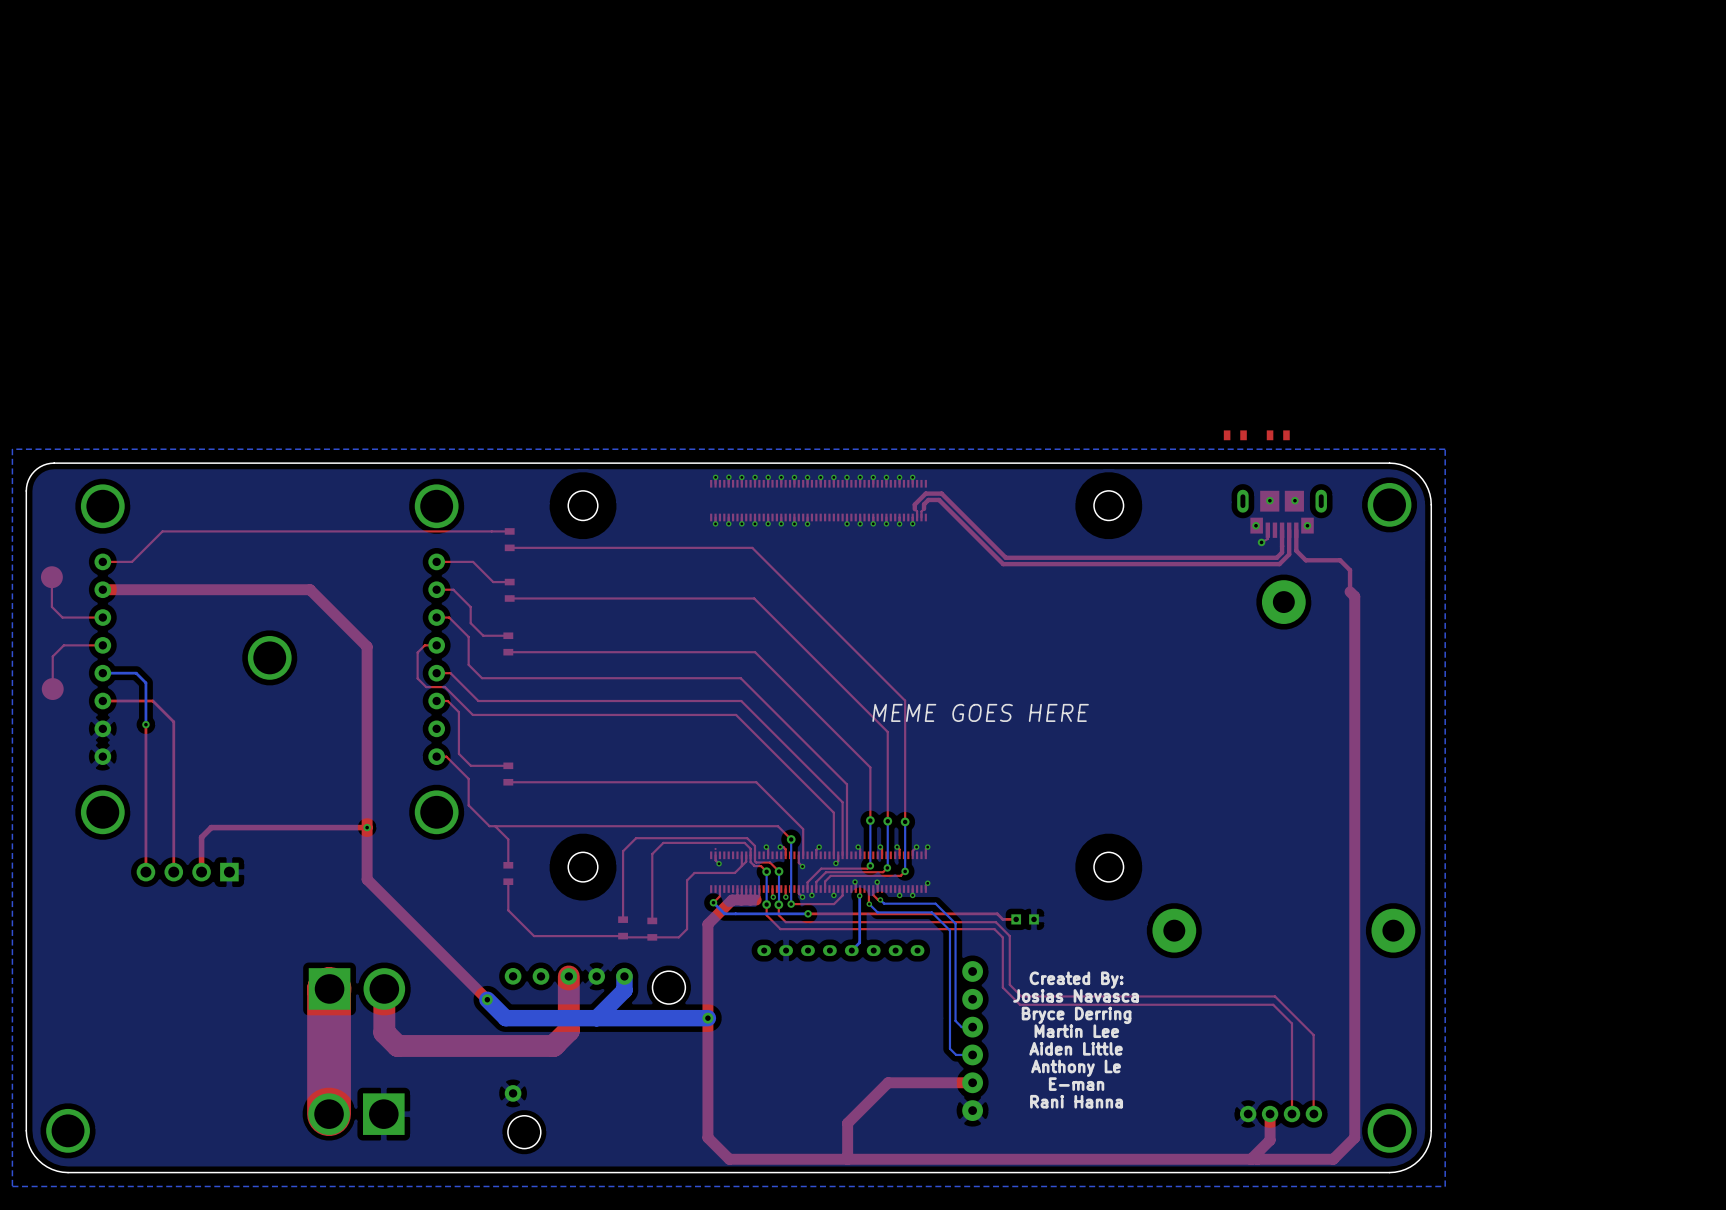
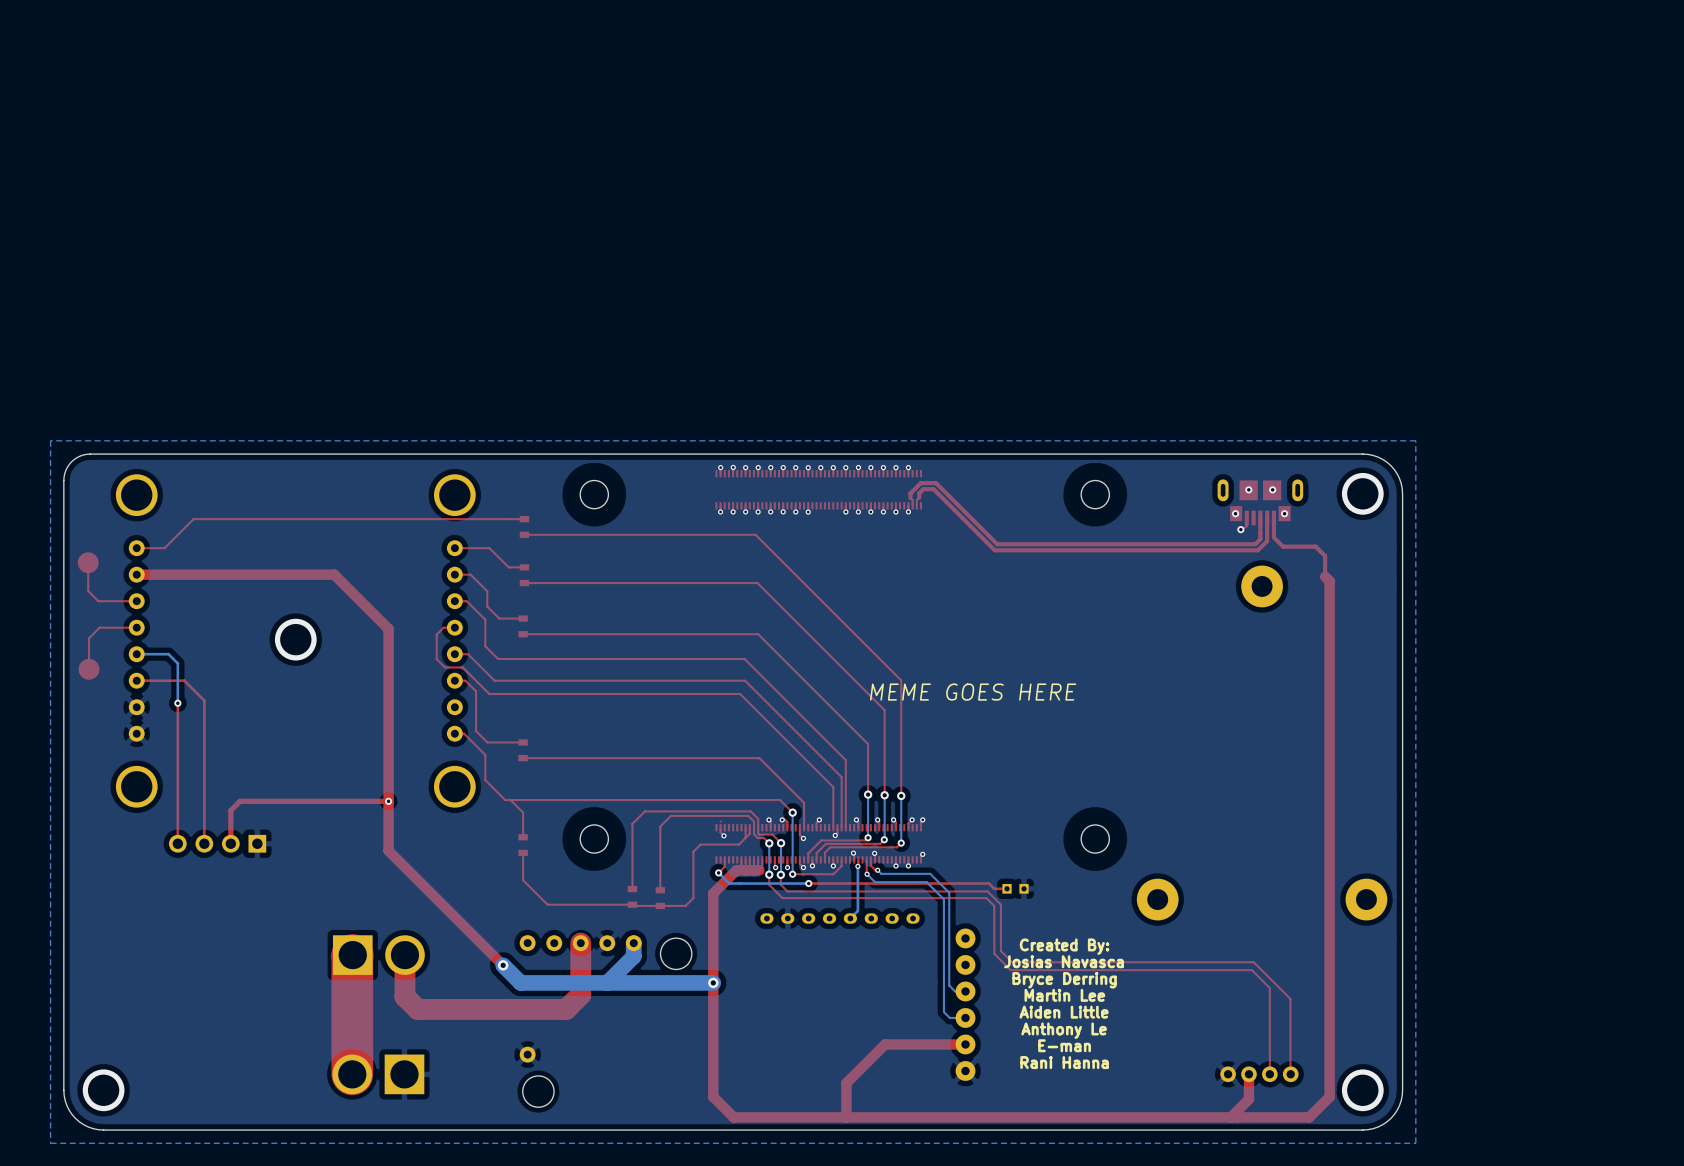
part: (1235, 435) -> none
part: (1278, 435) -> none

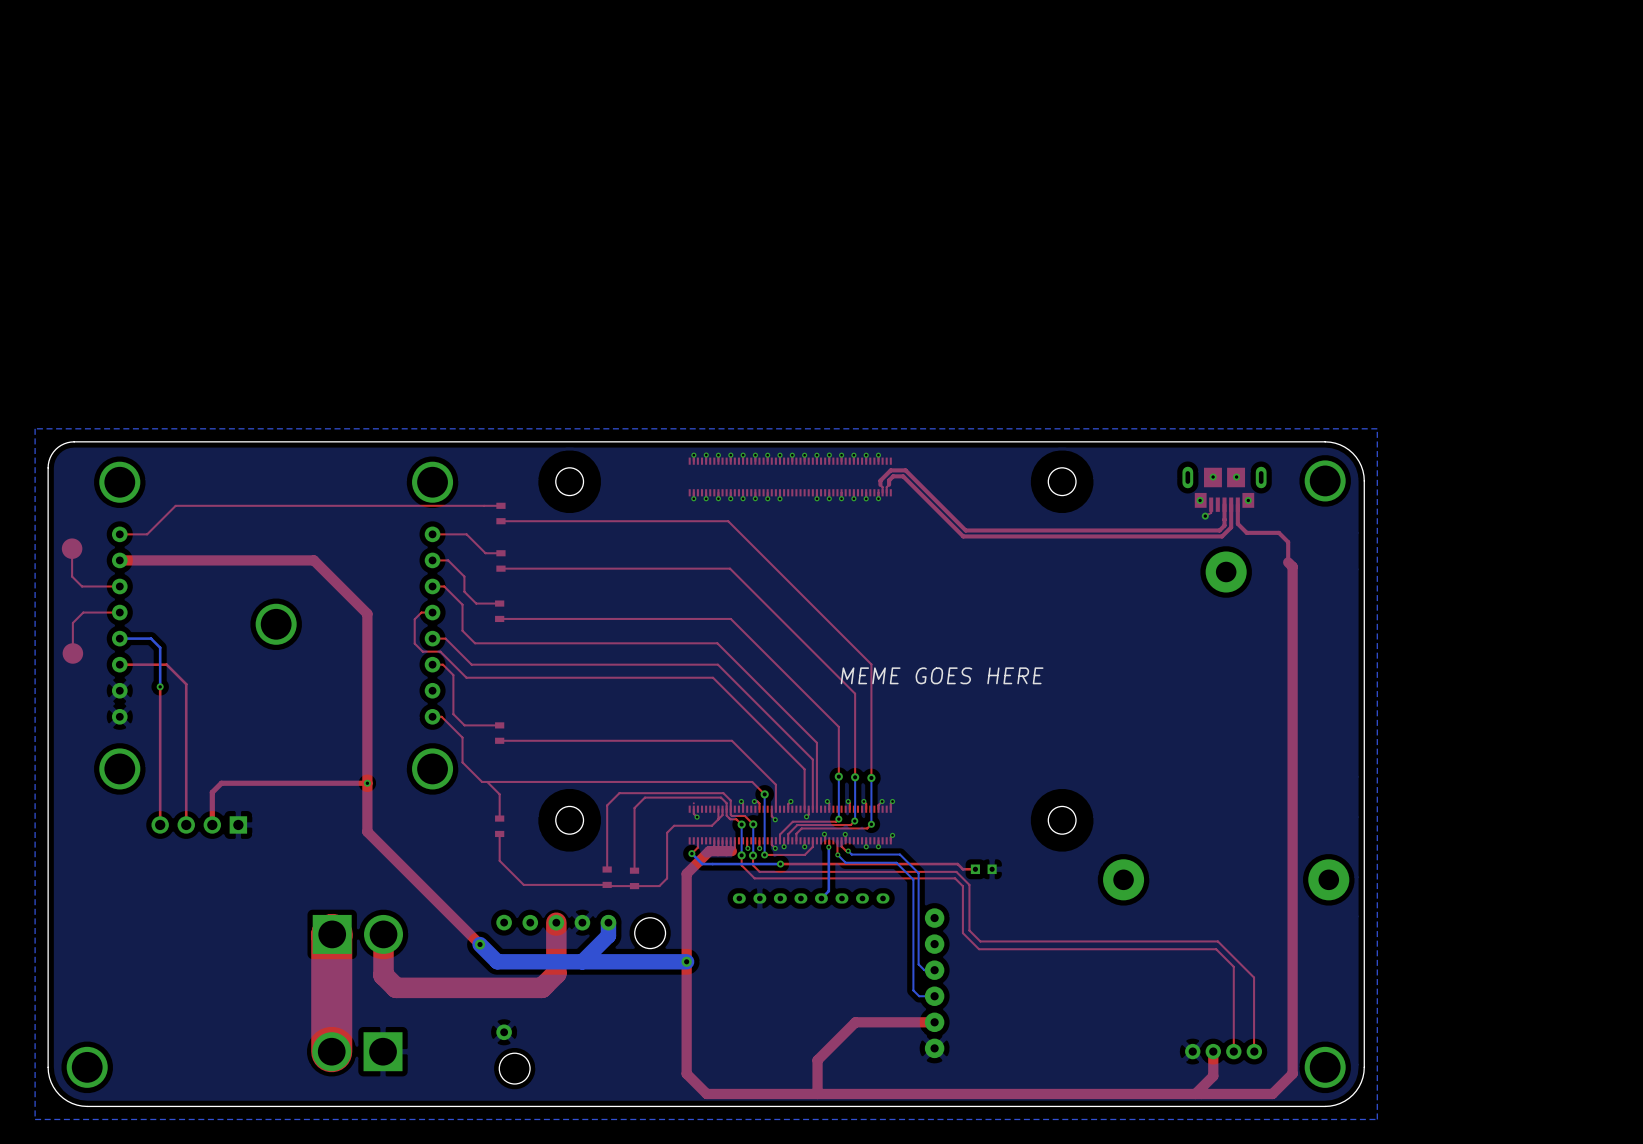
text: Created By: (1064, 946) -> none
text: Josias Navasca (1064, 961) -> none
text: Bryce Derring (1064, 980) -> none
text: Martin Lee (1064, 995) -> none
text: Aiden Little (1064, 1012) -> none
text: Anthony Le (1064, 1030) -> none
text: E-man (1064, 1045) -> none
text: Rani Hanna (1064, 1062) -> none

